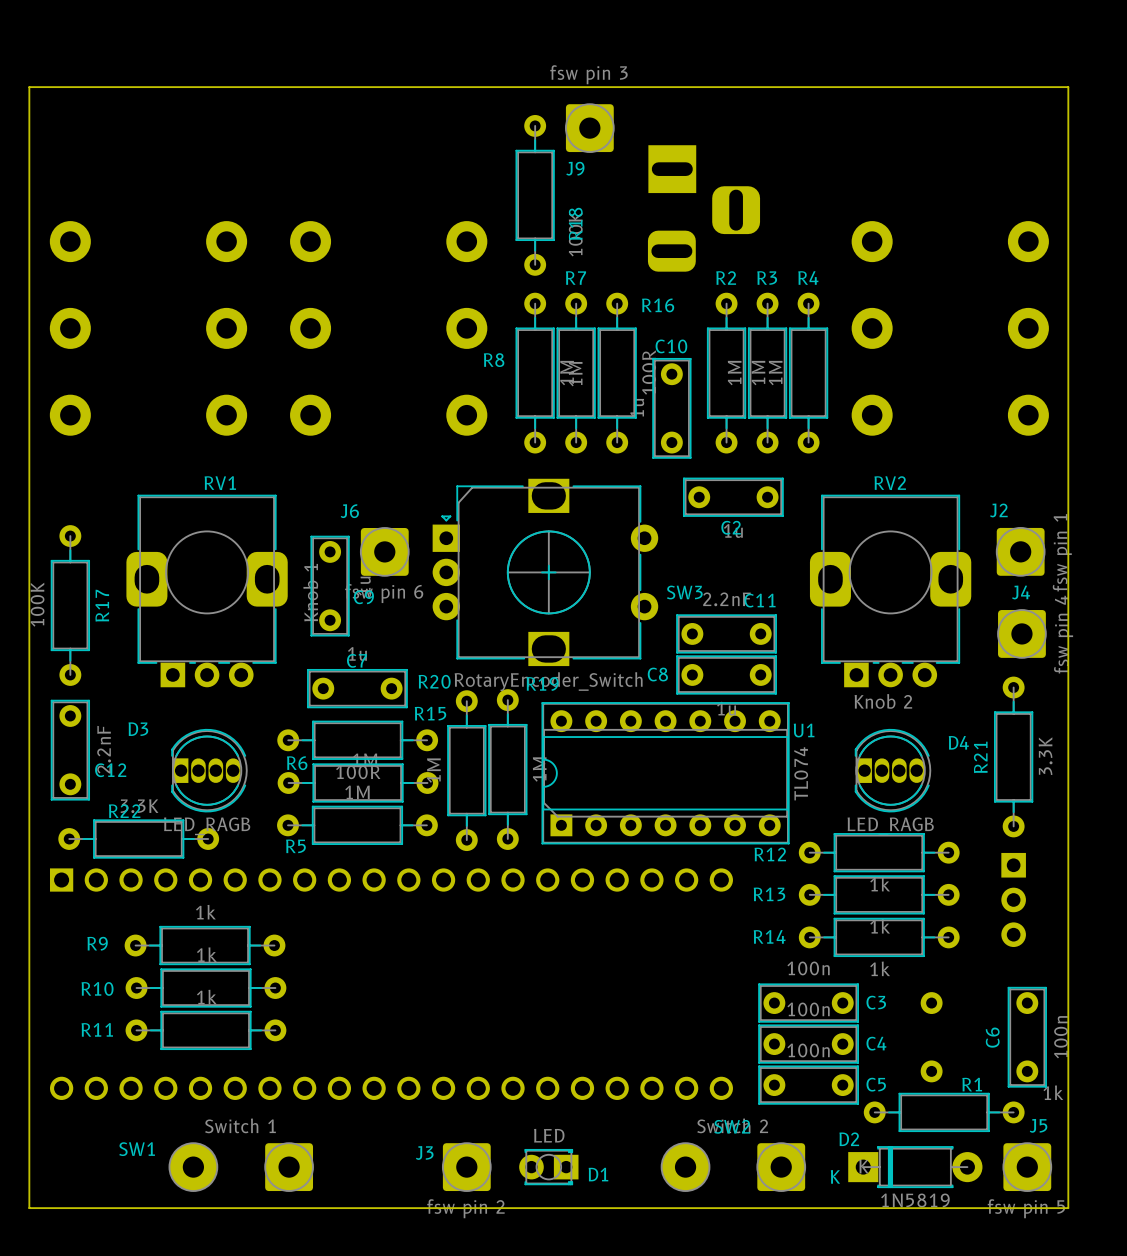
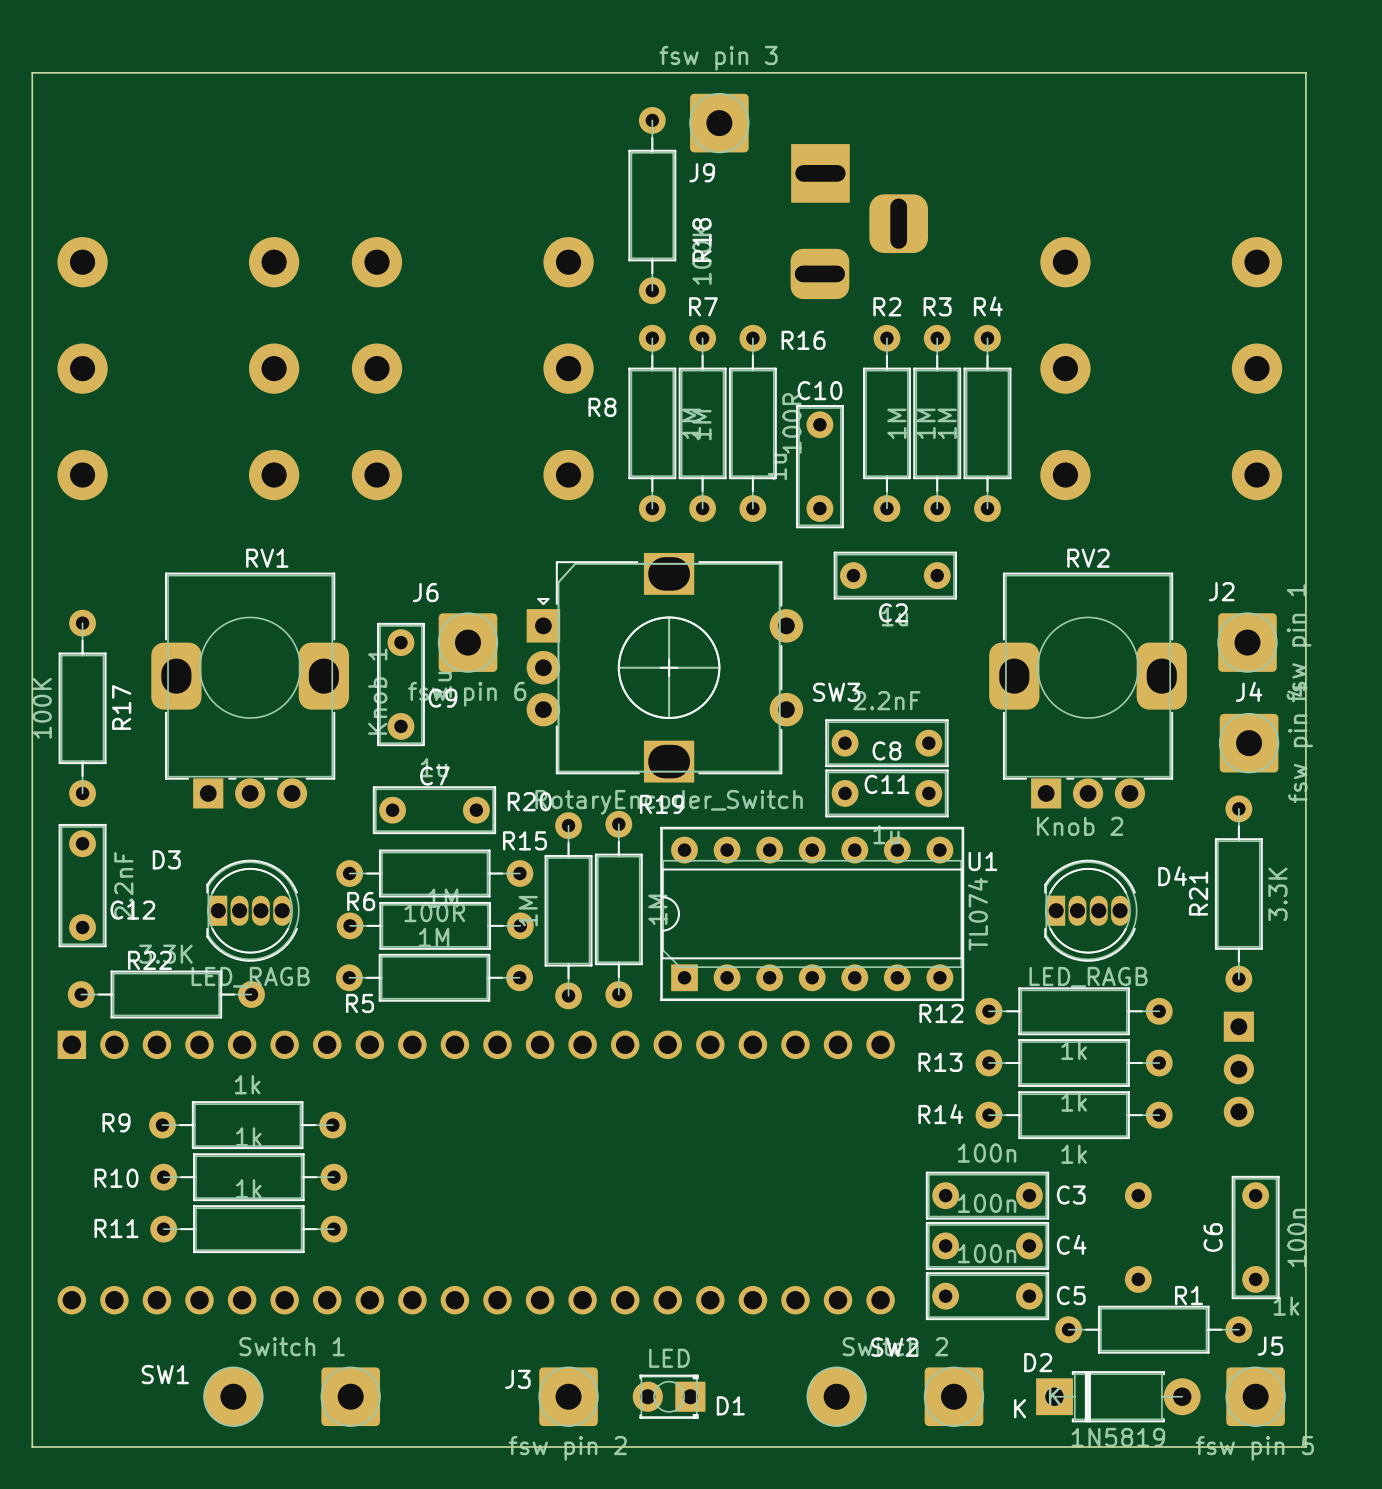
C11 name position: C11 (760, 600) -> C11 (886, 784)
C8 name position: C8 (657, 674) -> C8 (886, 750)

